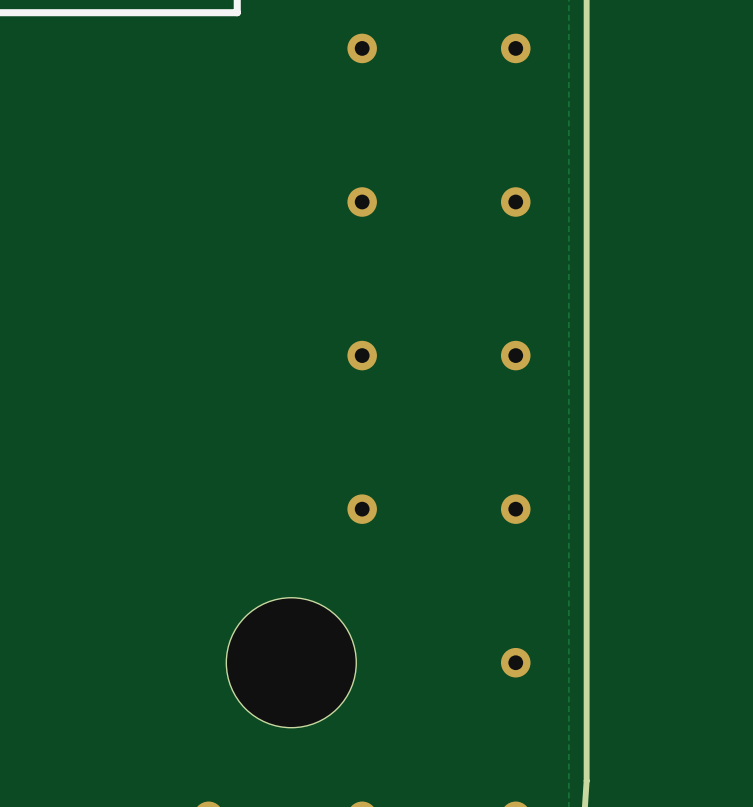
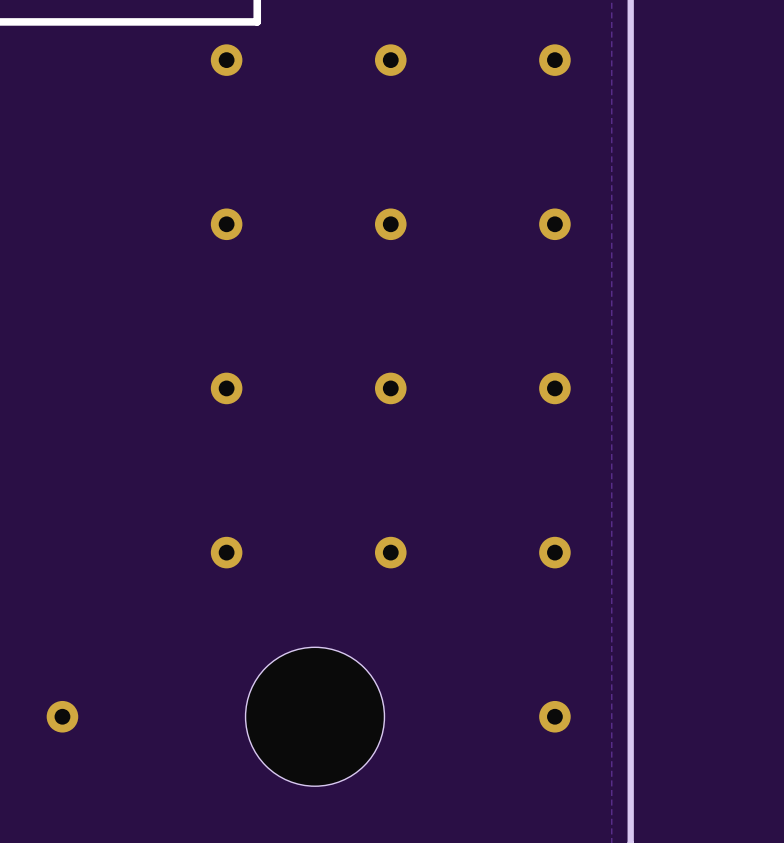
via: none -> (226, 60)
via: none -> (226, 224)
via: none -> (226, 388)
via: none -> (226, 552)
via: none -> (62, 716)

